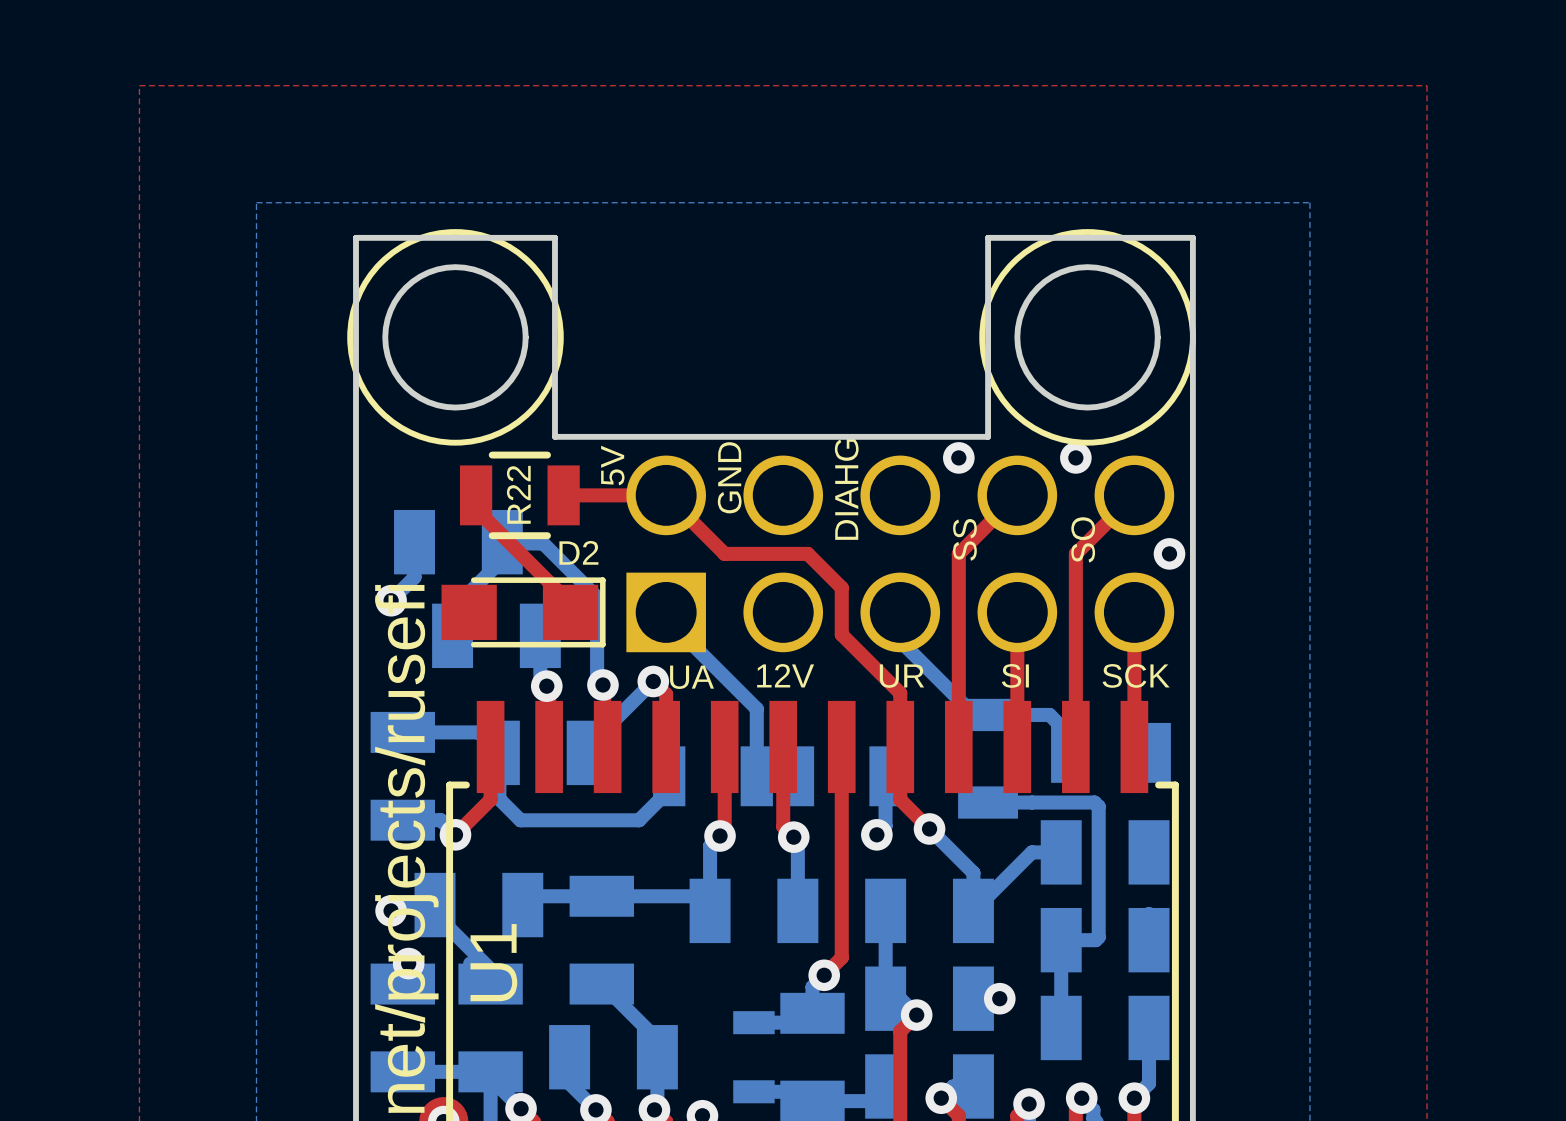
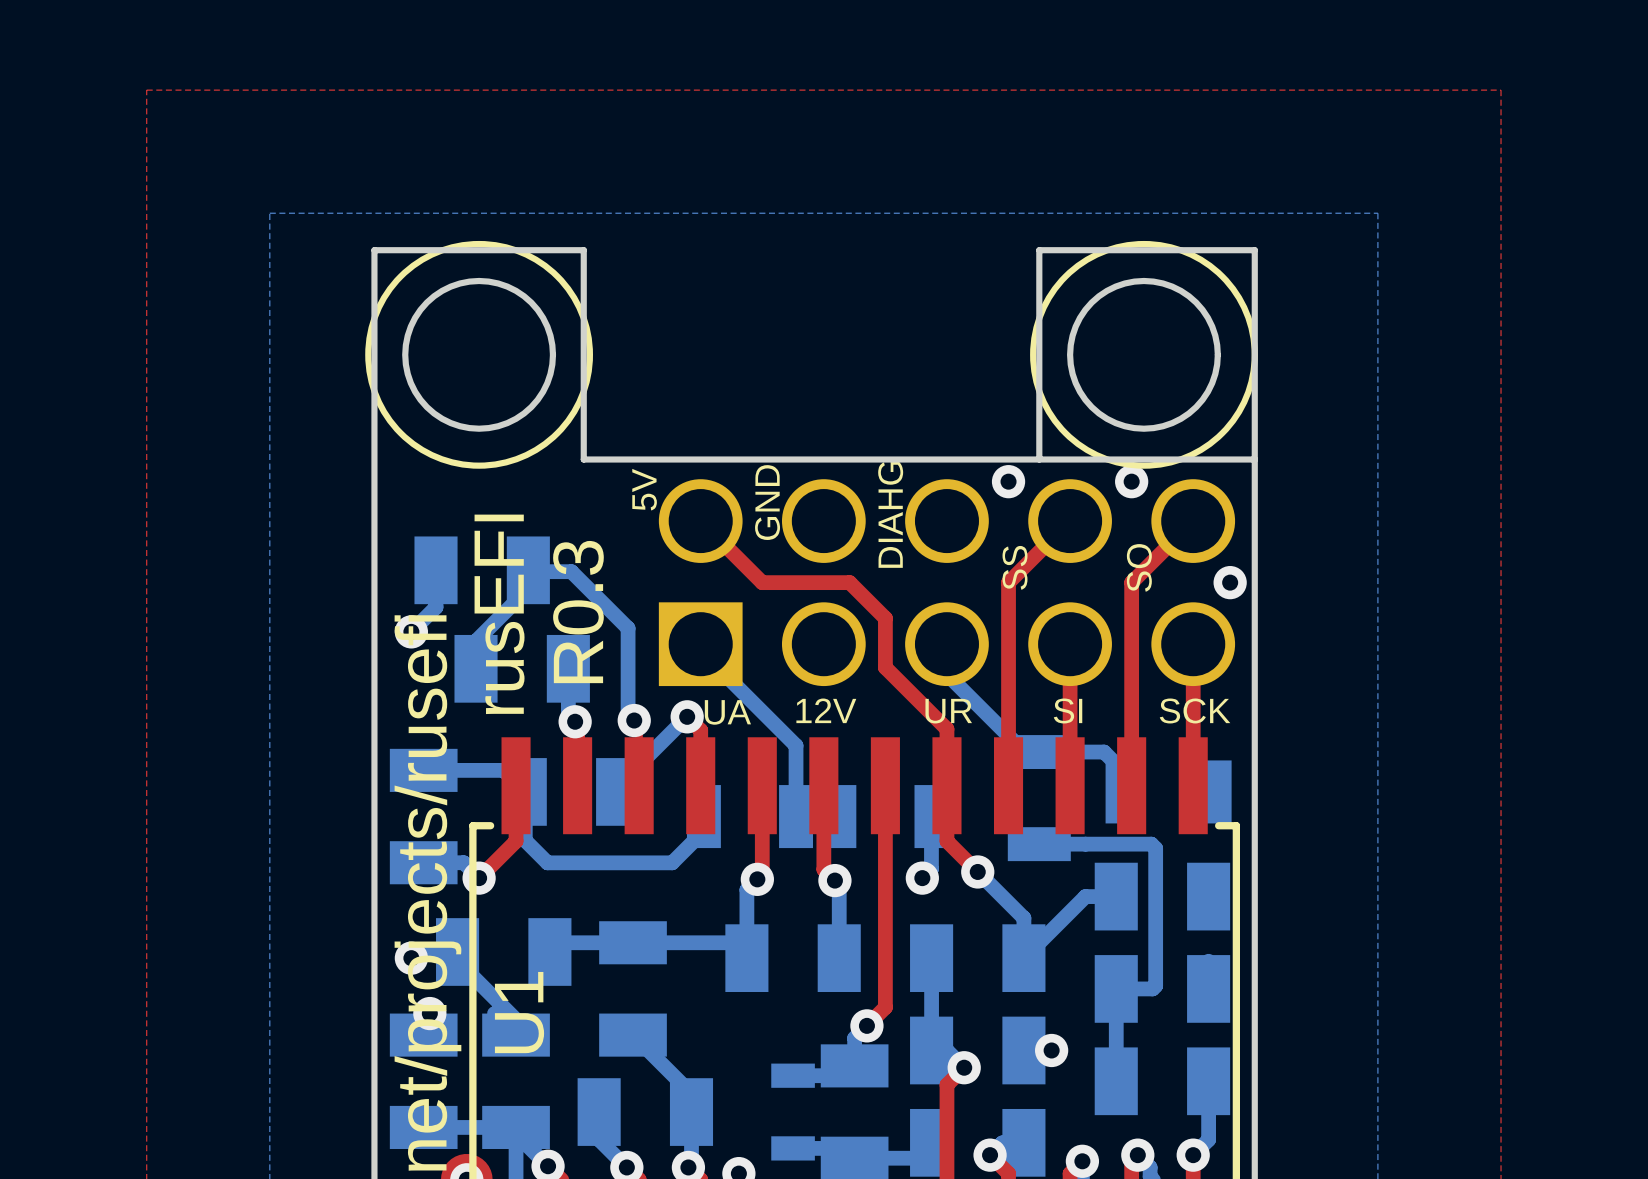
board edge: none -> (1039, 459) (1254, 459)
top track: (476, 495) (476, 509) (570, 603) (570, 612) -> none
R22: (519, 495) -> none
top track: (563, 495) (666, 495) -> none
text: none -> R0.3 (578, 612)
text: none -> rusEFI (499, 614)
D2: (523, 612) -> none

